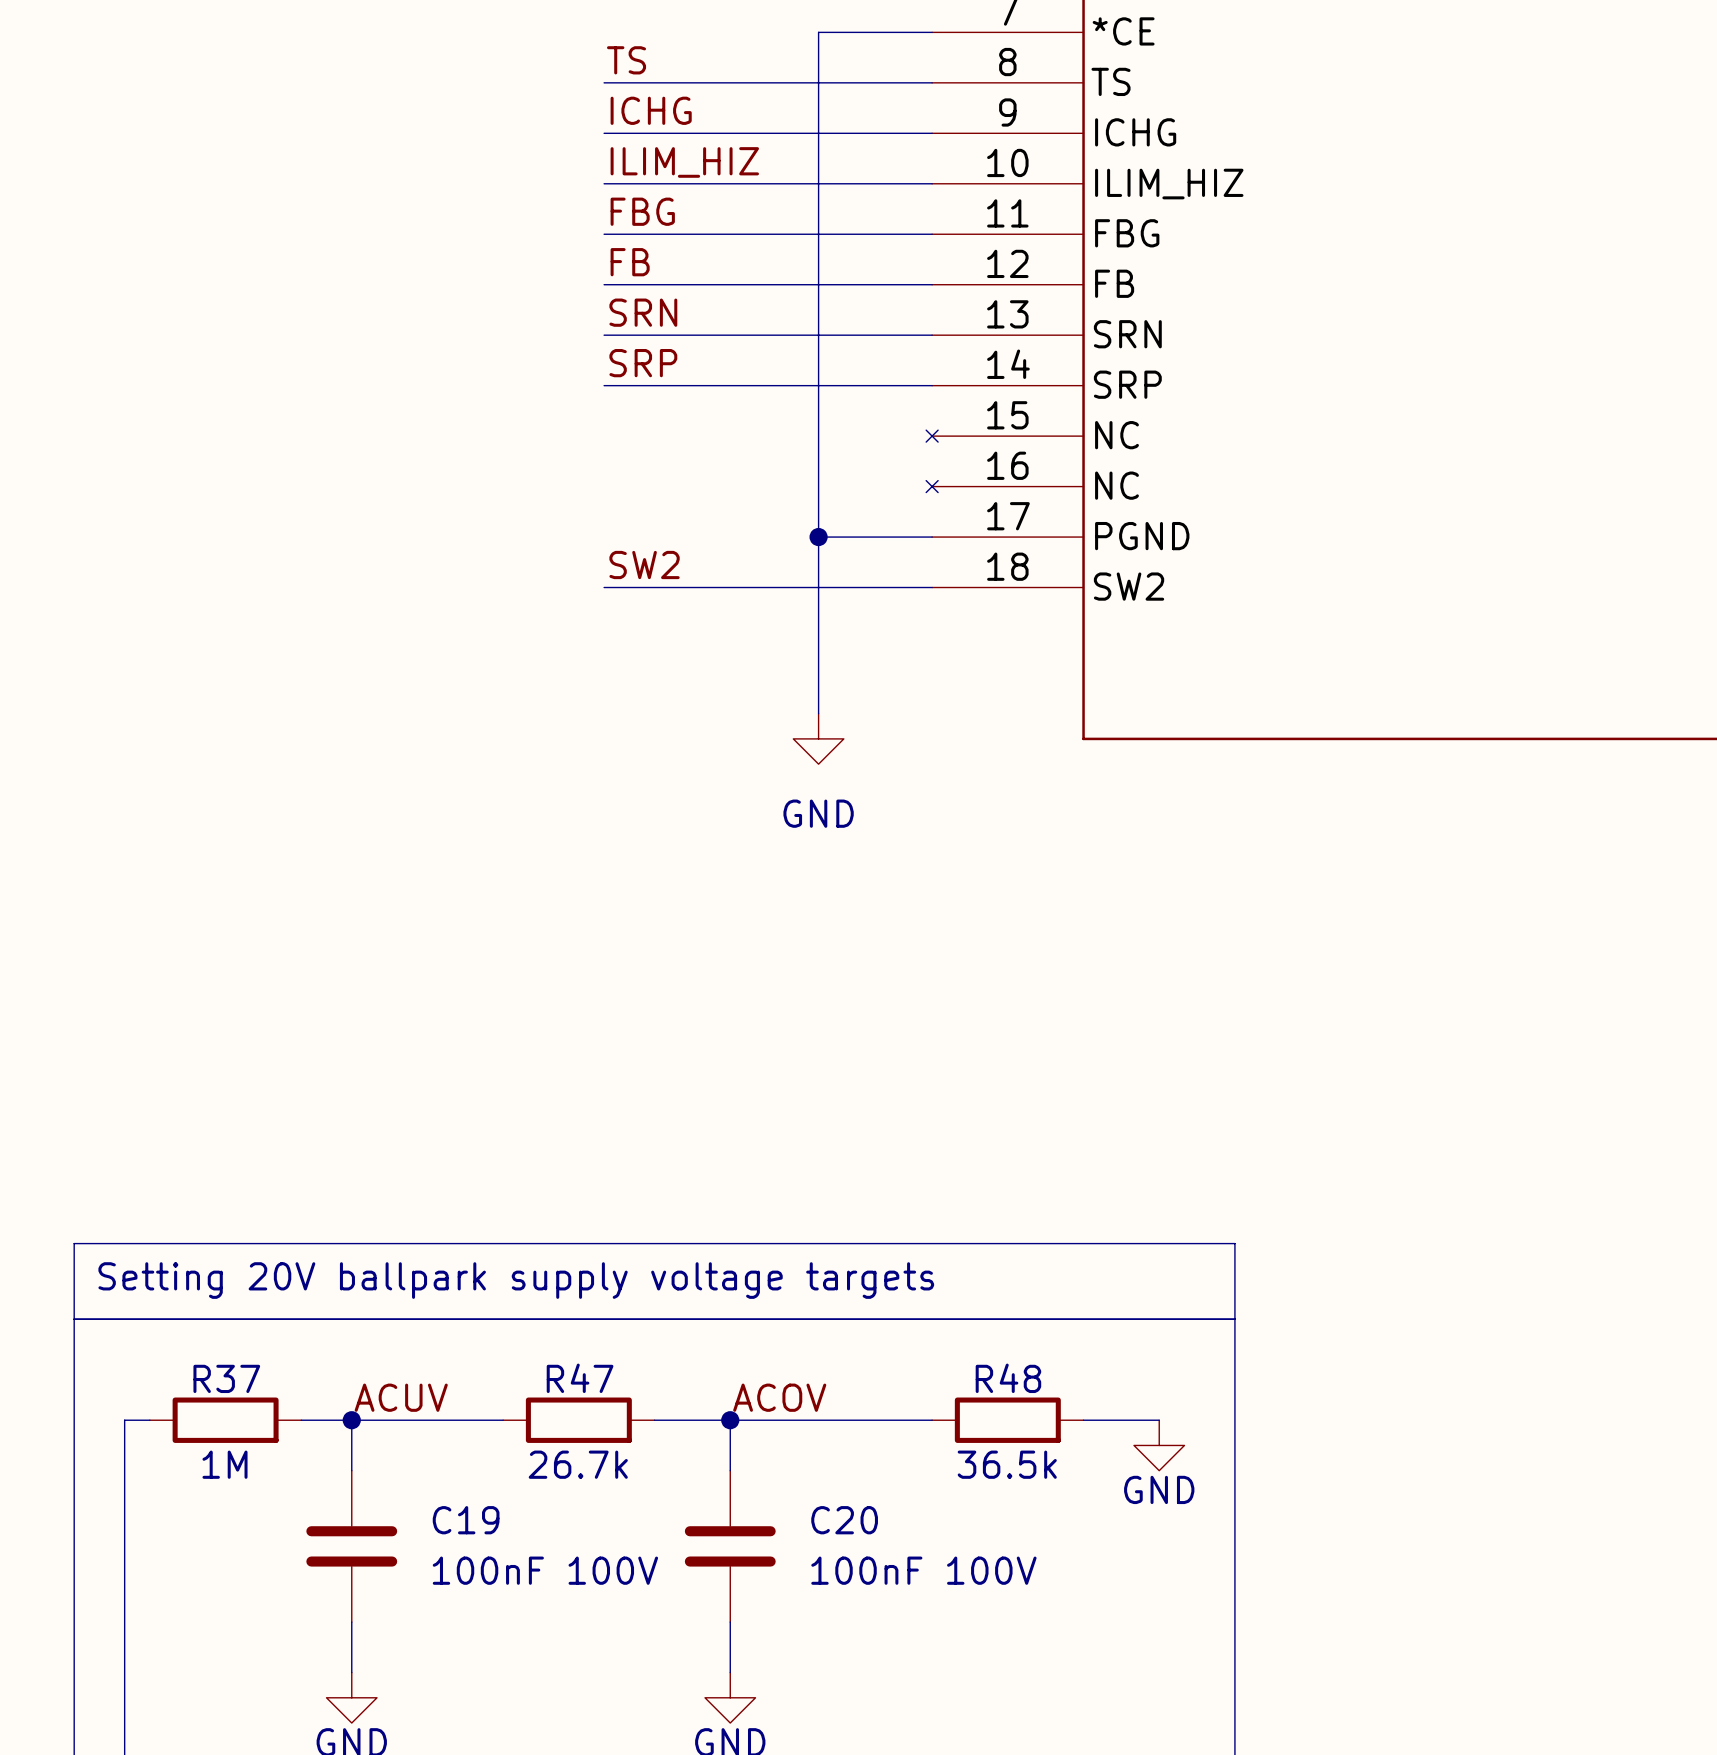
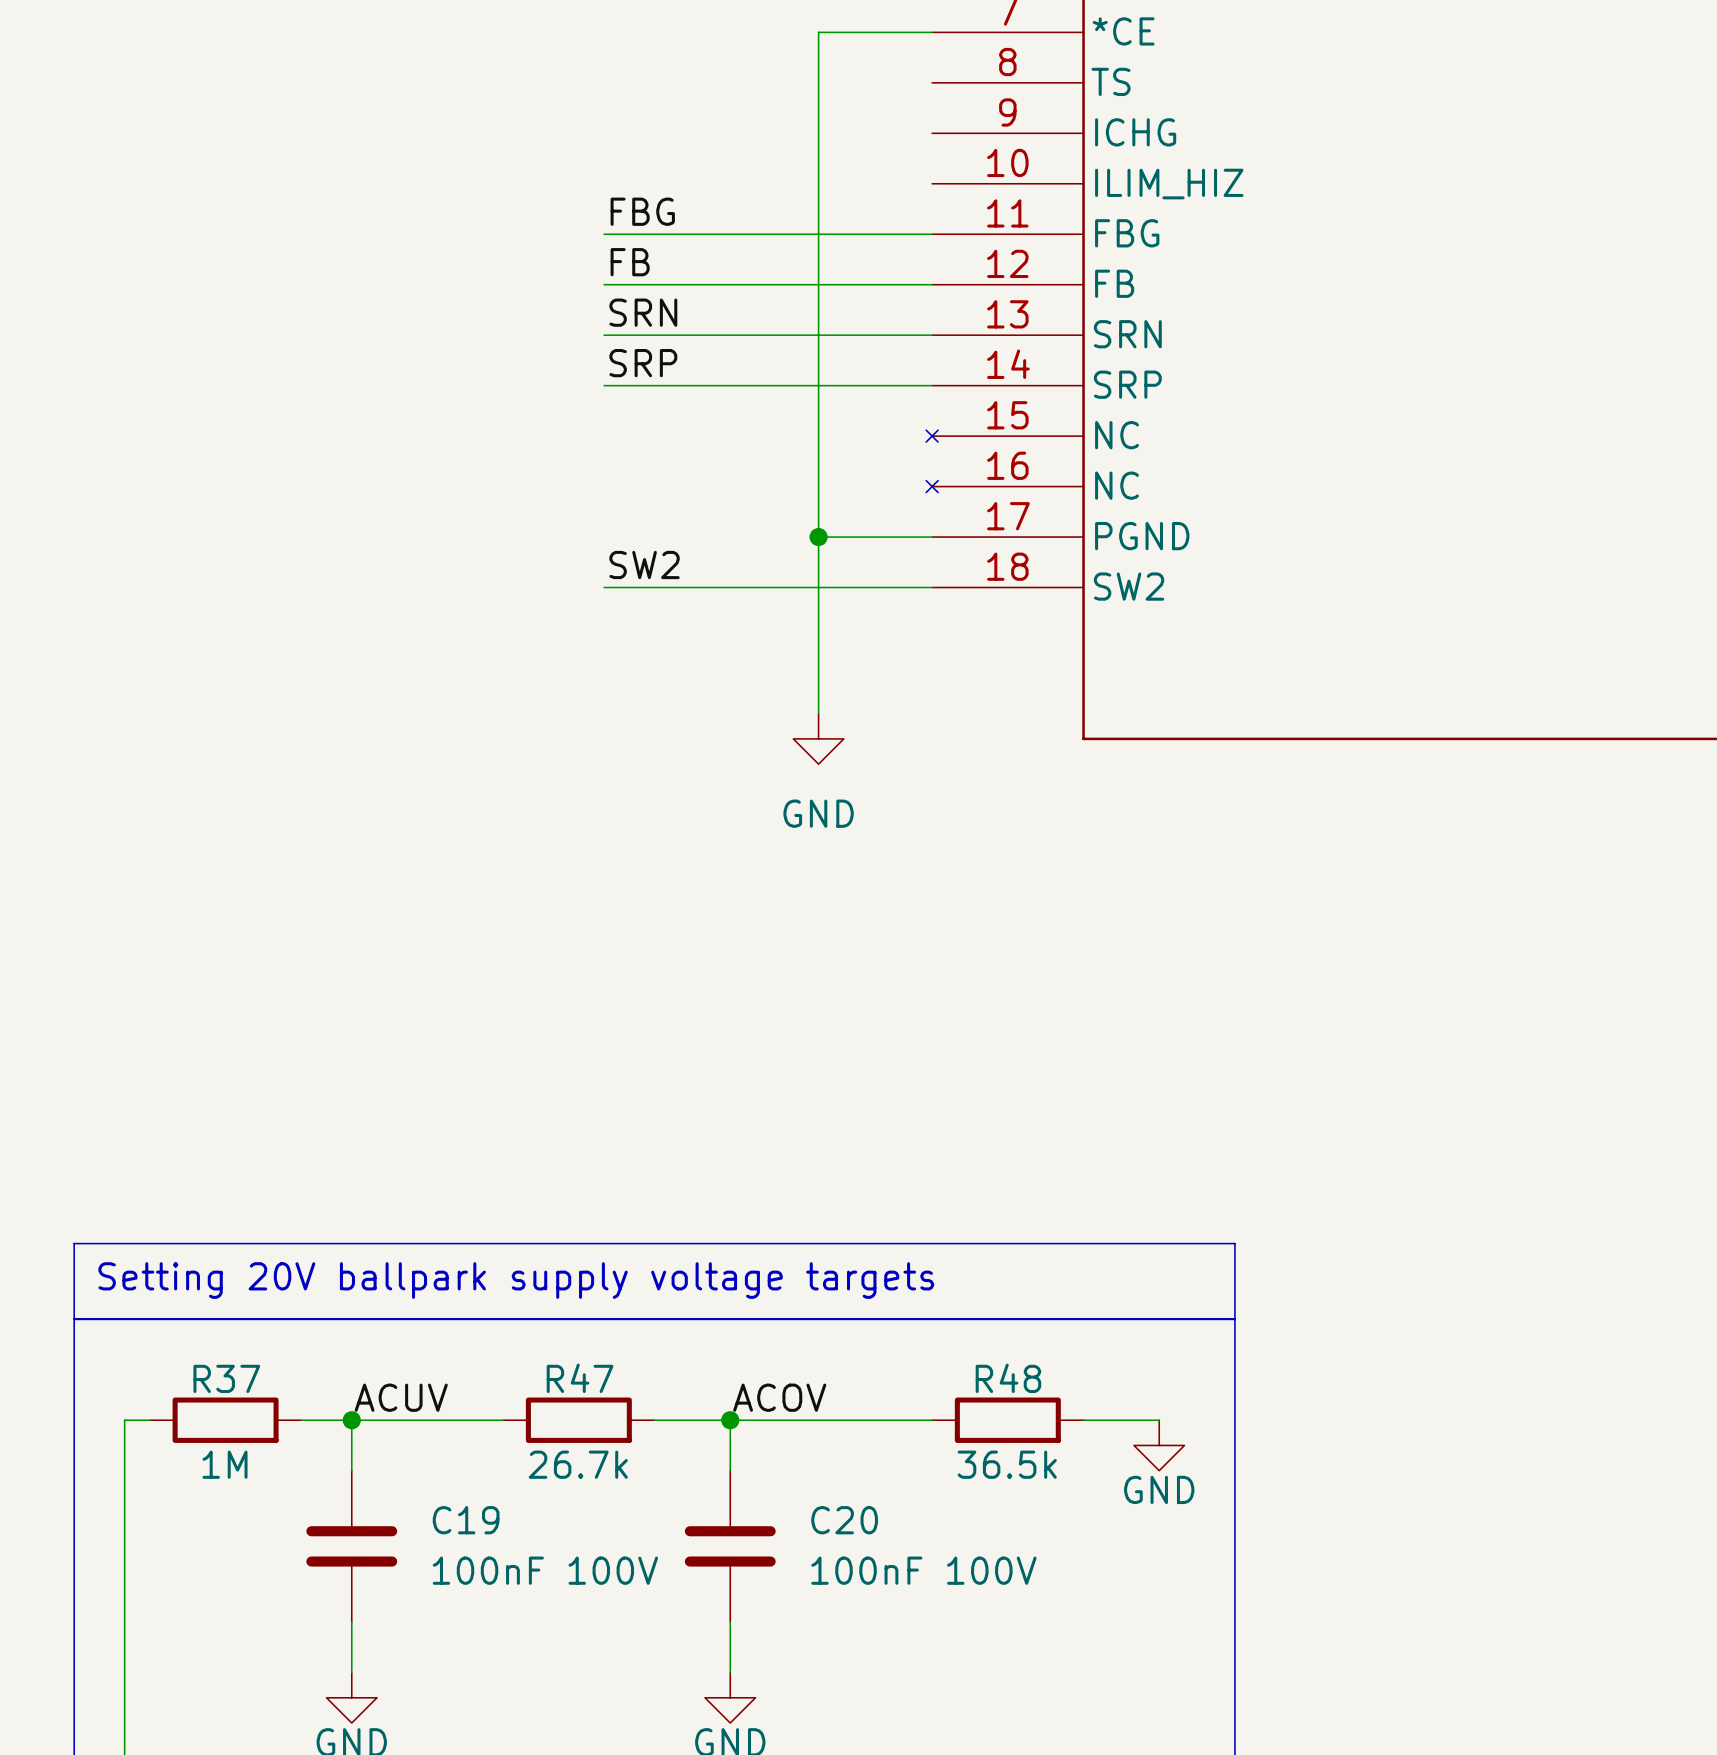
label: TS (626, 60) -> none
wire: (604, 82) (932, 82) -> none
label: ICHG (651, 110) -> none
wire: (604, 133) (932, 133) -> none
label: ILIM_HIZ (684, 162) -> none
wire: (604, 183) (932, 183) -> none

